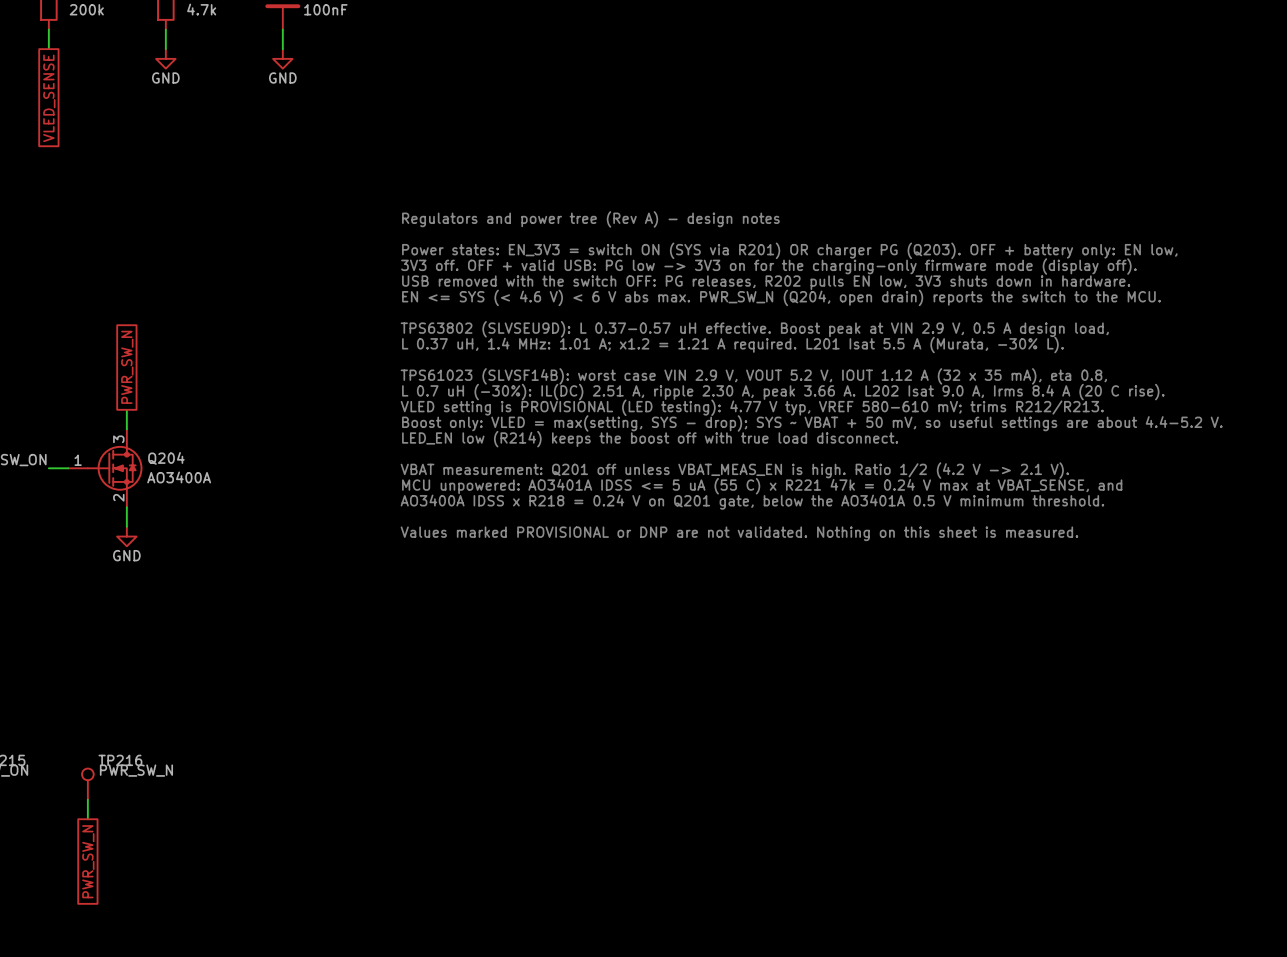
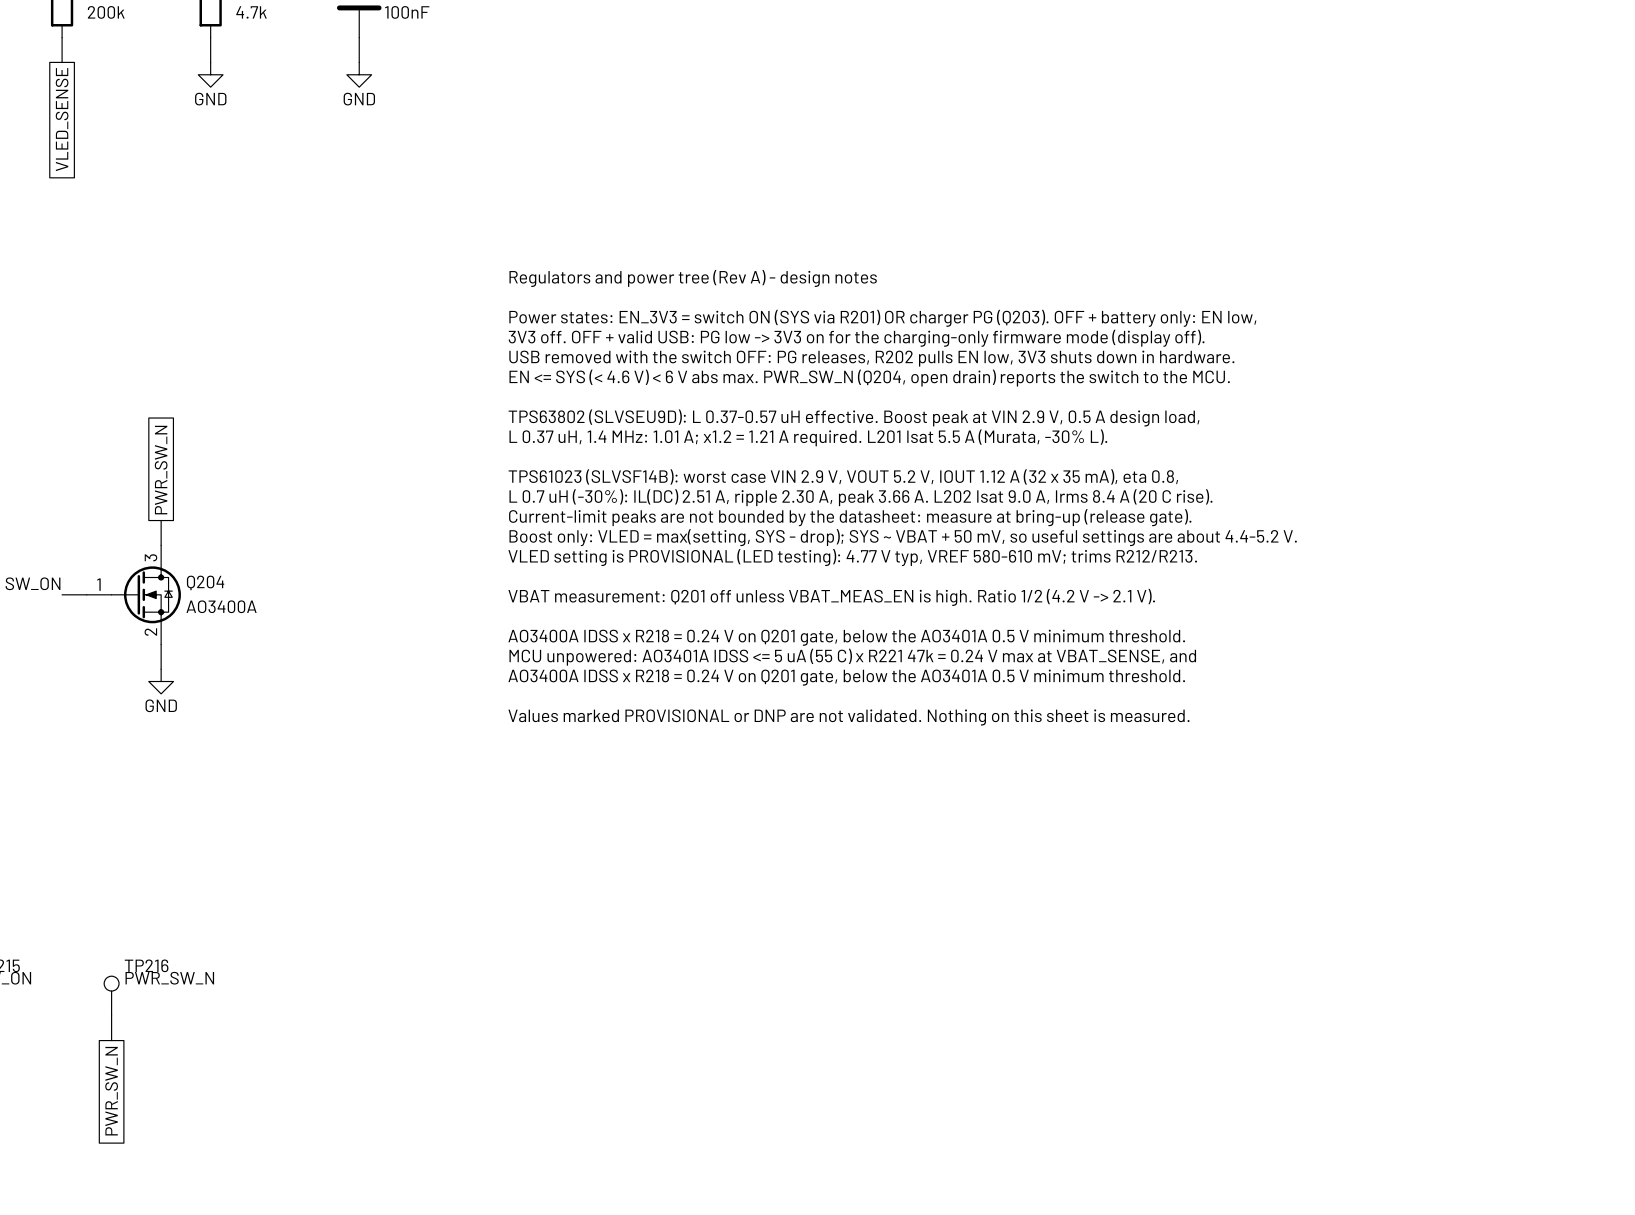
text: VLED setting is PROVISIONAL (LED testing): 4.77 V typ, VREF 580-610 mV; trims R212/R213. (752, 407) -> Current-limit peaks are not bounded by the datasheet: measure at bring-up (release gate). (850, 517)
text: LED_EN low (R214) keeps the boost off with true load disconnect. (650, 439) -> VLED setting is PROVISIONAL (LED testing): 4.77 V typ, VREF 580-610 mV; trims R212/R213. (852, 557)
text position: MCU unpowered: AO3401A IDSS <= 5 uA (55 C) x R221 47k = 0.24 V max at VBAT_SENSE, and (762, 486) -> MCU unpowered: AO3401A IDSS <= 5 uA (55 C) x R221 47k = 0.24 V max at VBAT_SENSE, and (852, 657)
text: Values marked PROVISIONAL or DNP are not validated. Nothing on this sheet is measured. (739, 533) -> AO3400A IDSS x R218 = 0.24 V on Q201 gate, below the AO3401A 0.5 V minimum threshold. (846, 677)
text: none -> Values marked PROVISIONAL or DNP are not validated. Nothing on this sheet is measured. (848, 717)

